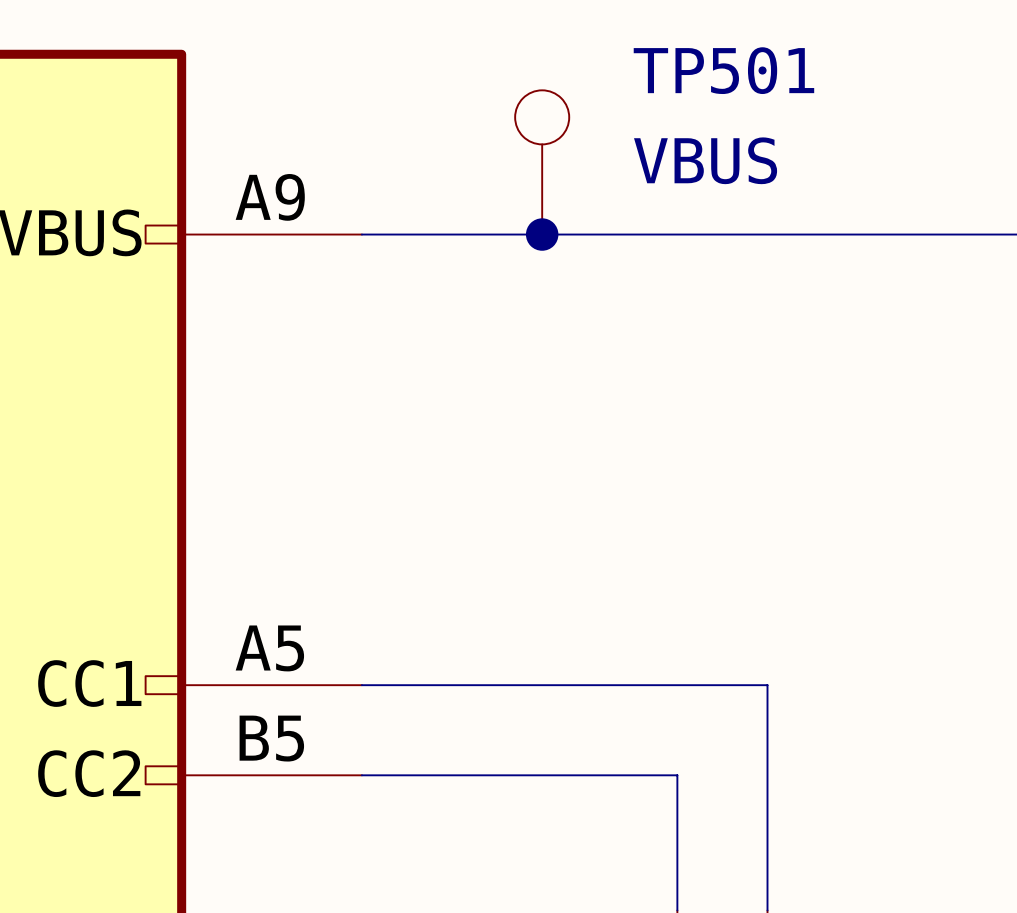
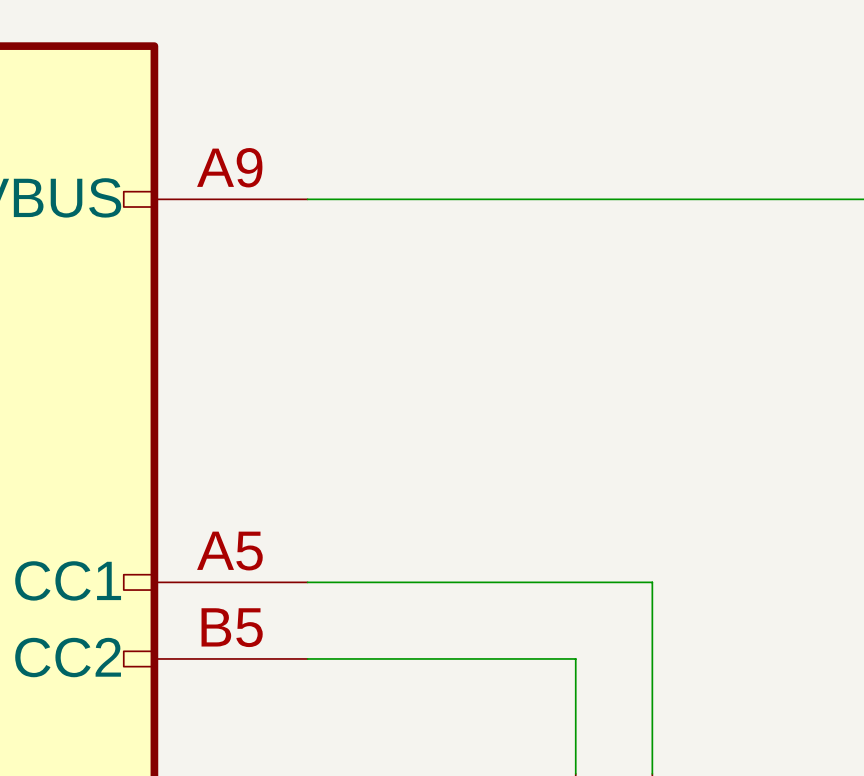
TP501: VBUS (542, 162) -> none
junction: (542, 234) -> none

